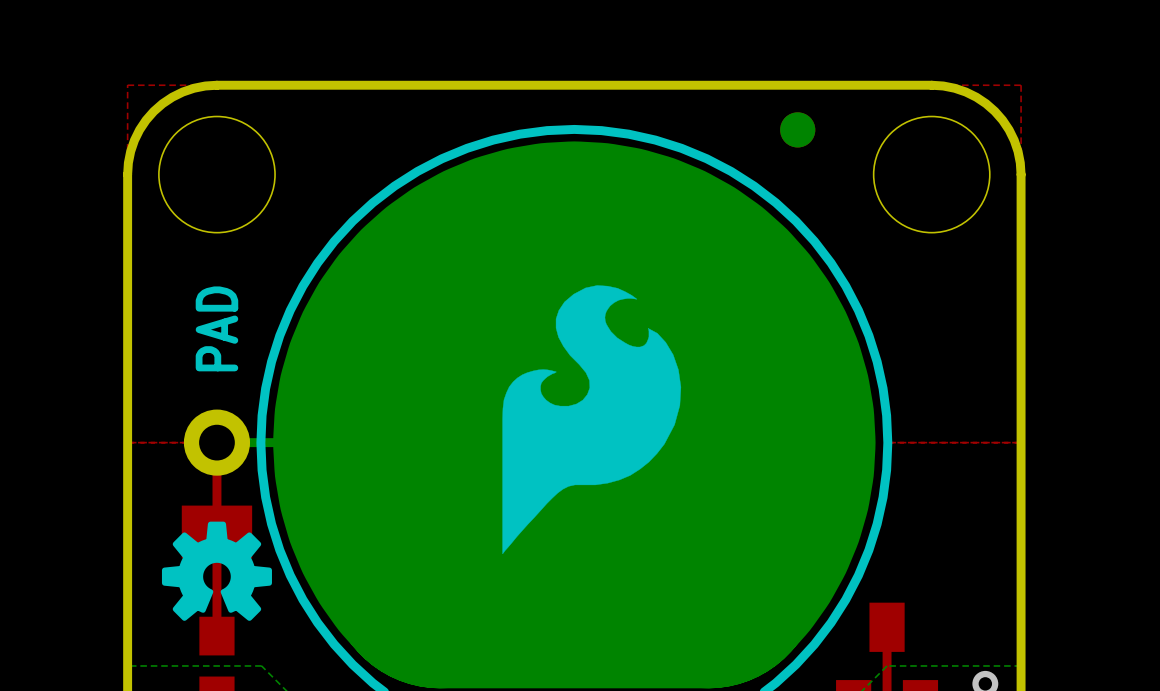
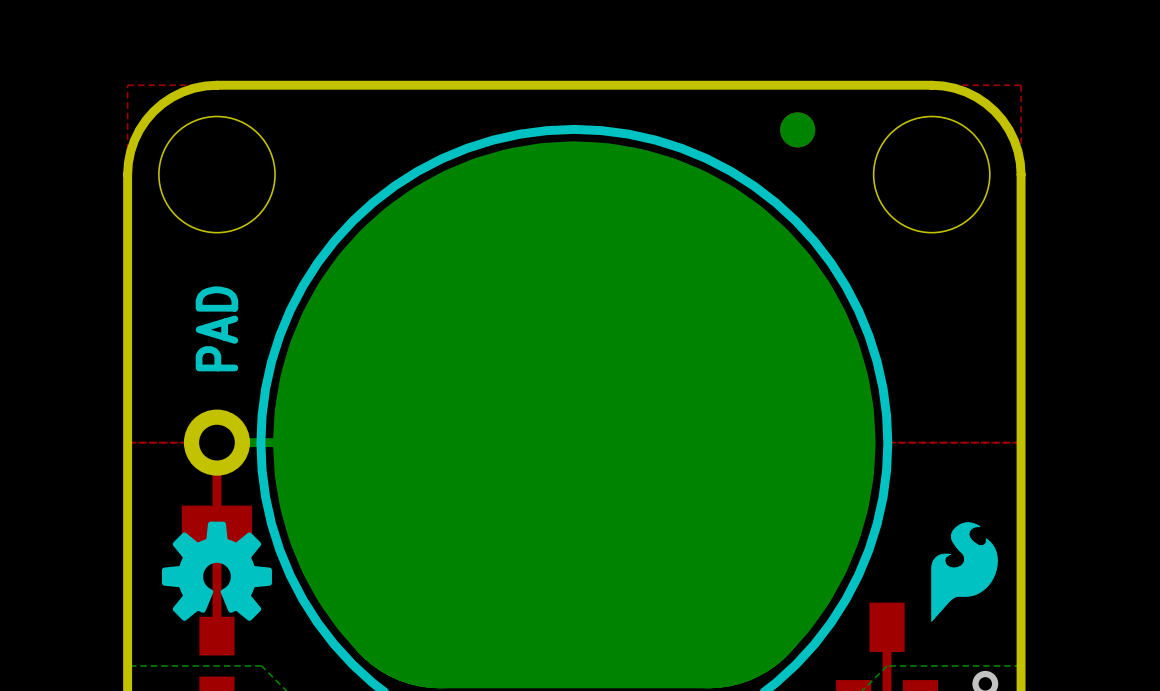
drawing: [502, 285, 682, 555] -> none
drawing: none -> [931, 522, 998, 622]

